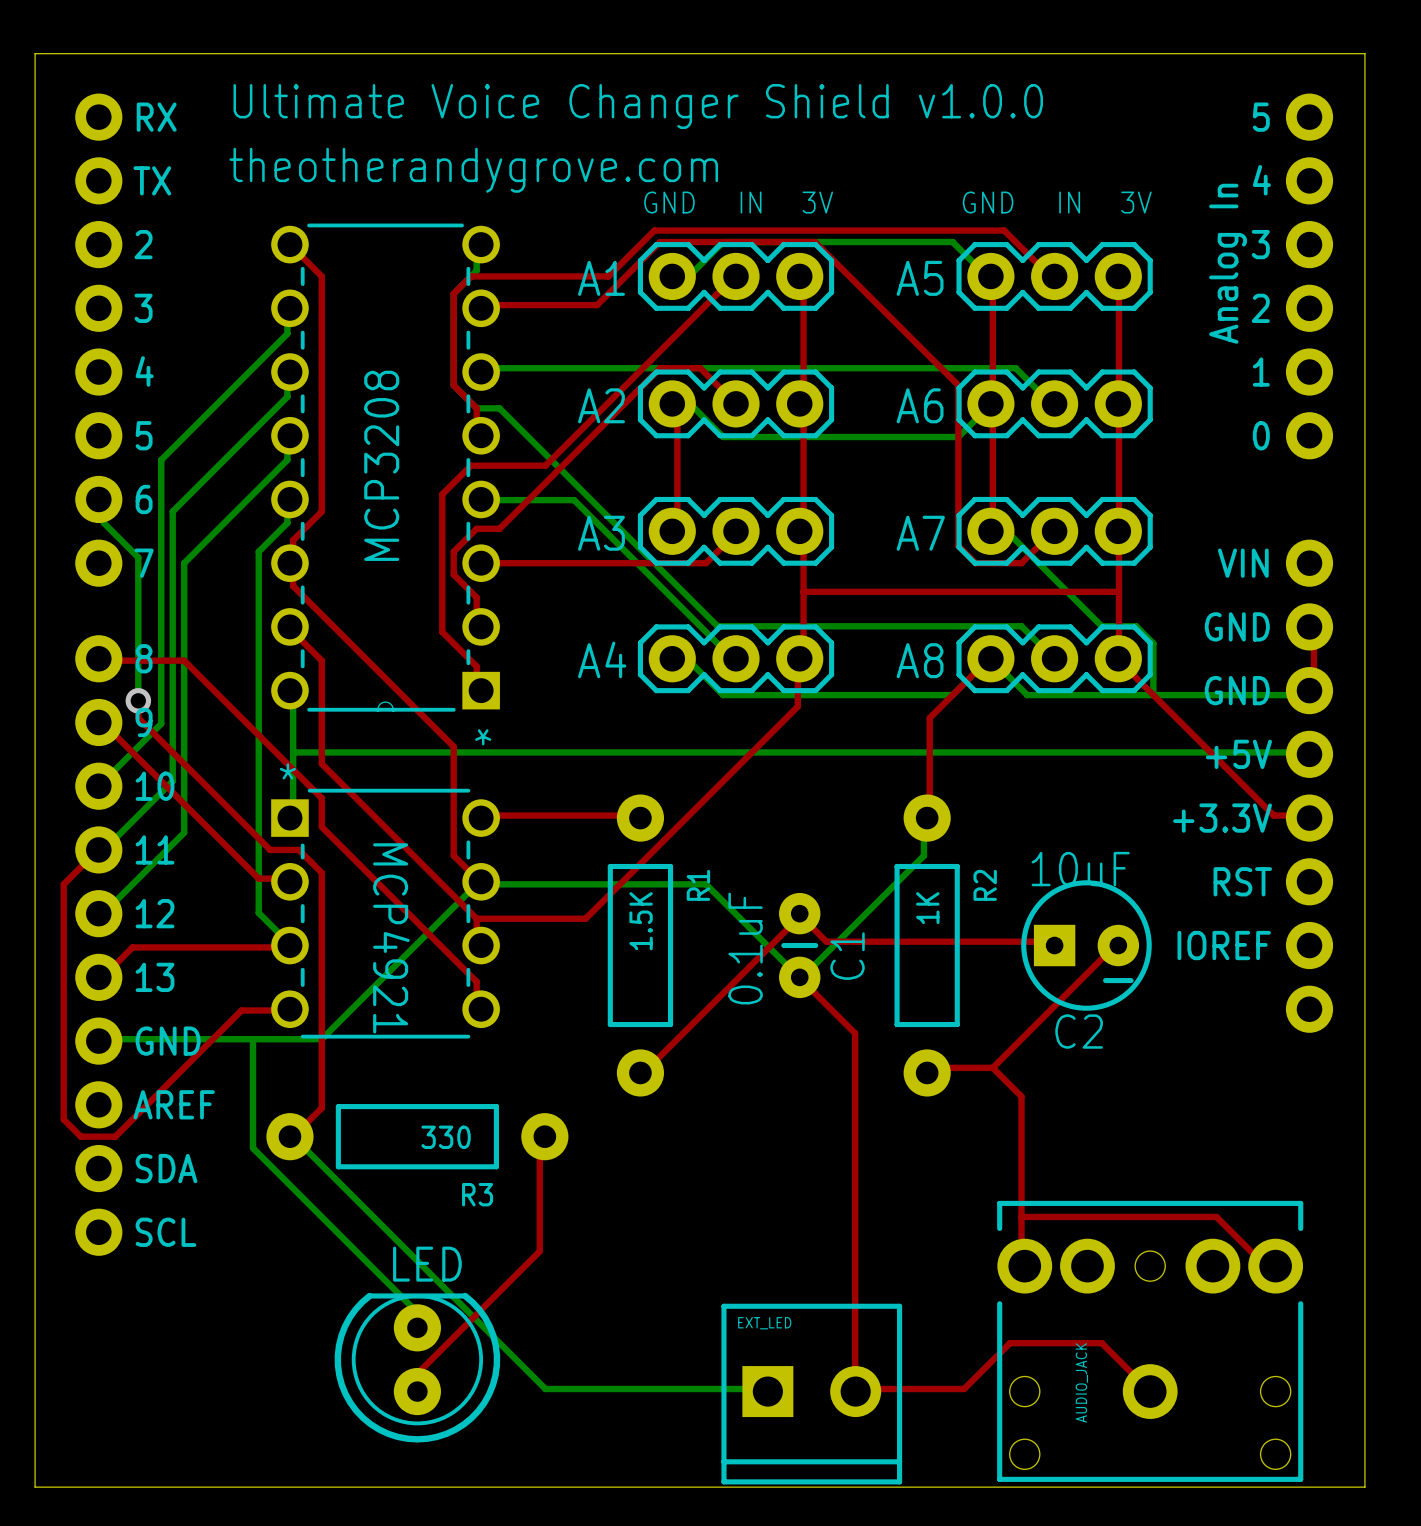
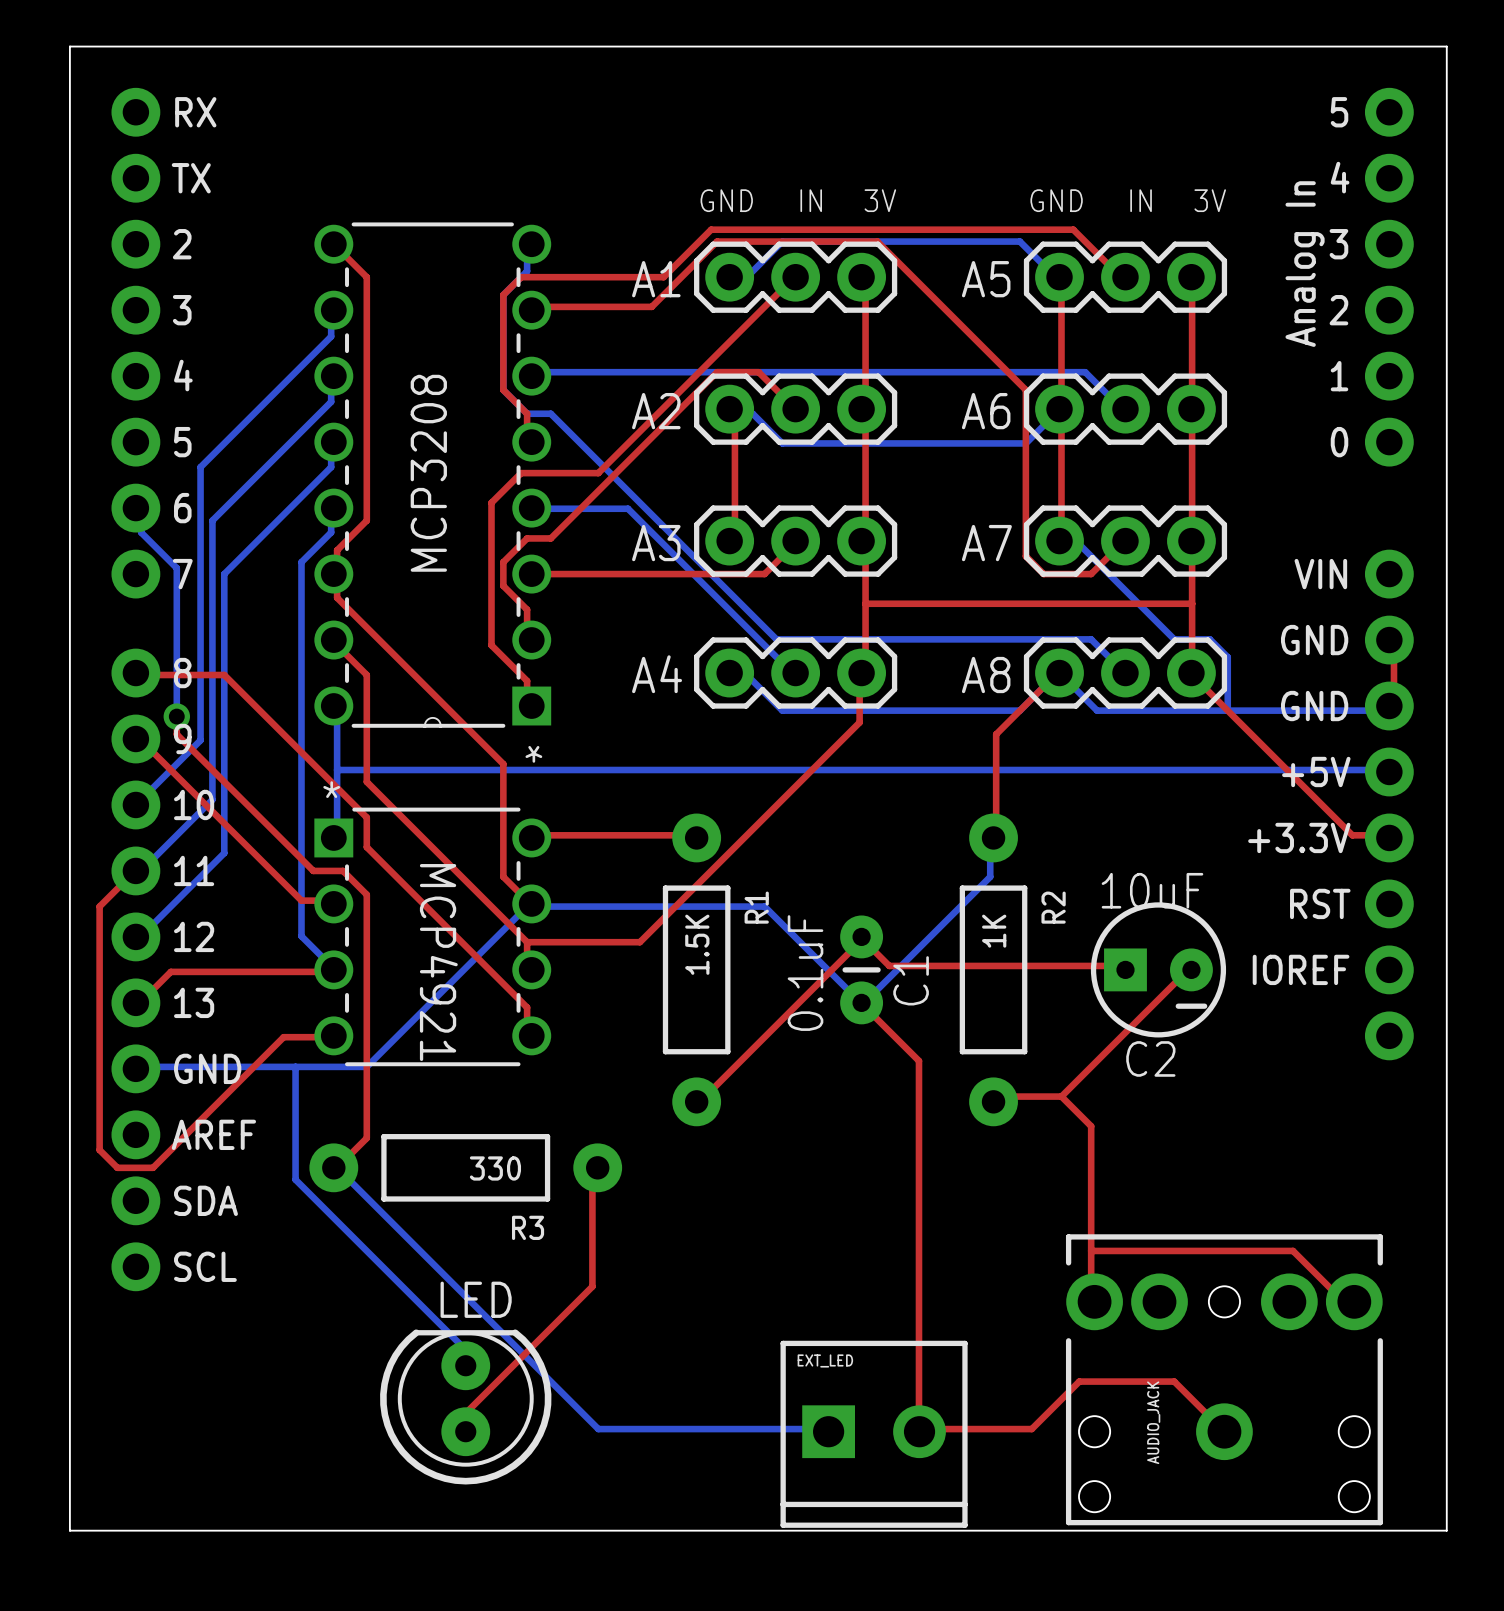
text: Ultimate Voice Changer Shield v1.0.0 (638, 106) -> none
text: theotherandygrove.com (473, 170) -> none

